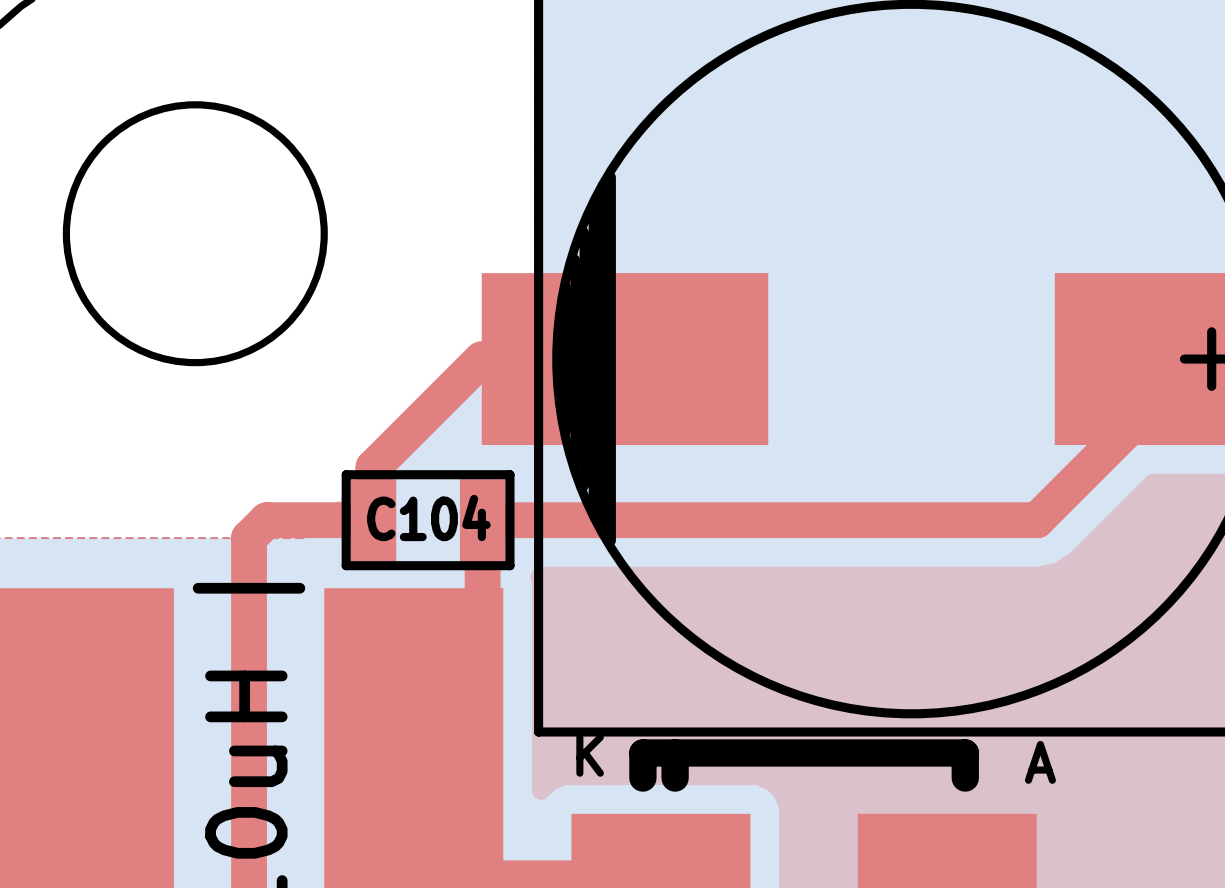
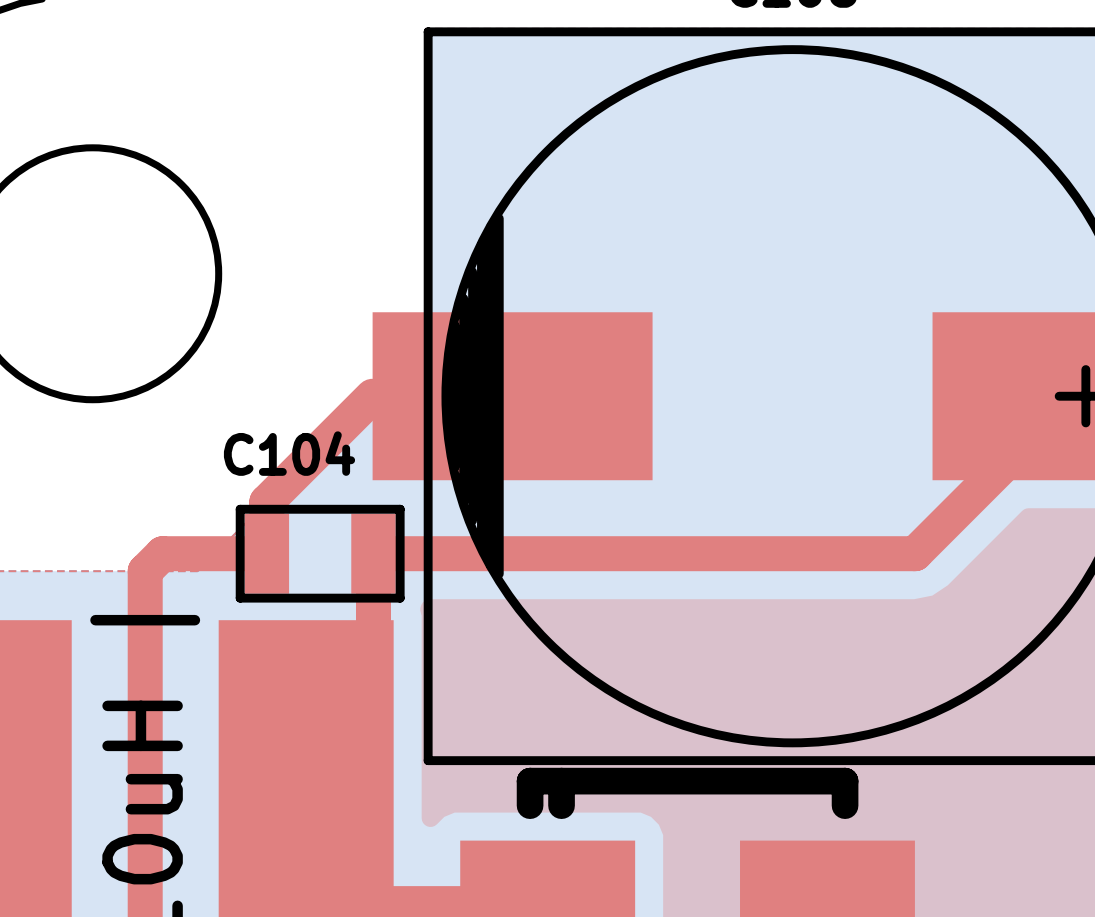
C104 name position: C104 (428, 517) -> C104 (289, 453)
part text: K (590, 755) -> none
part text: A (1040, 762) -> none

